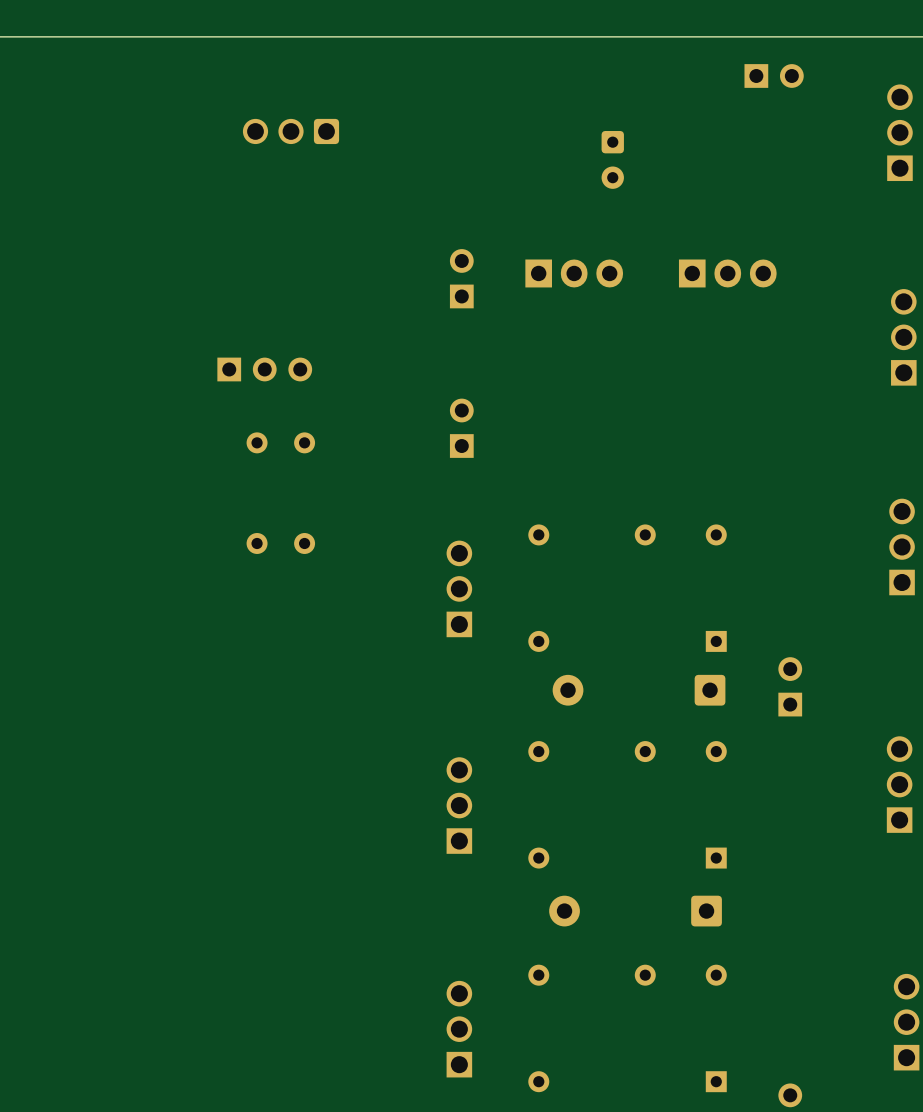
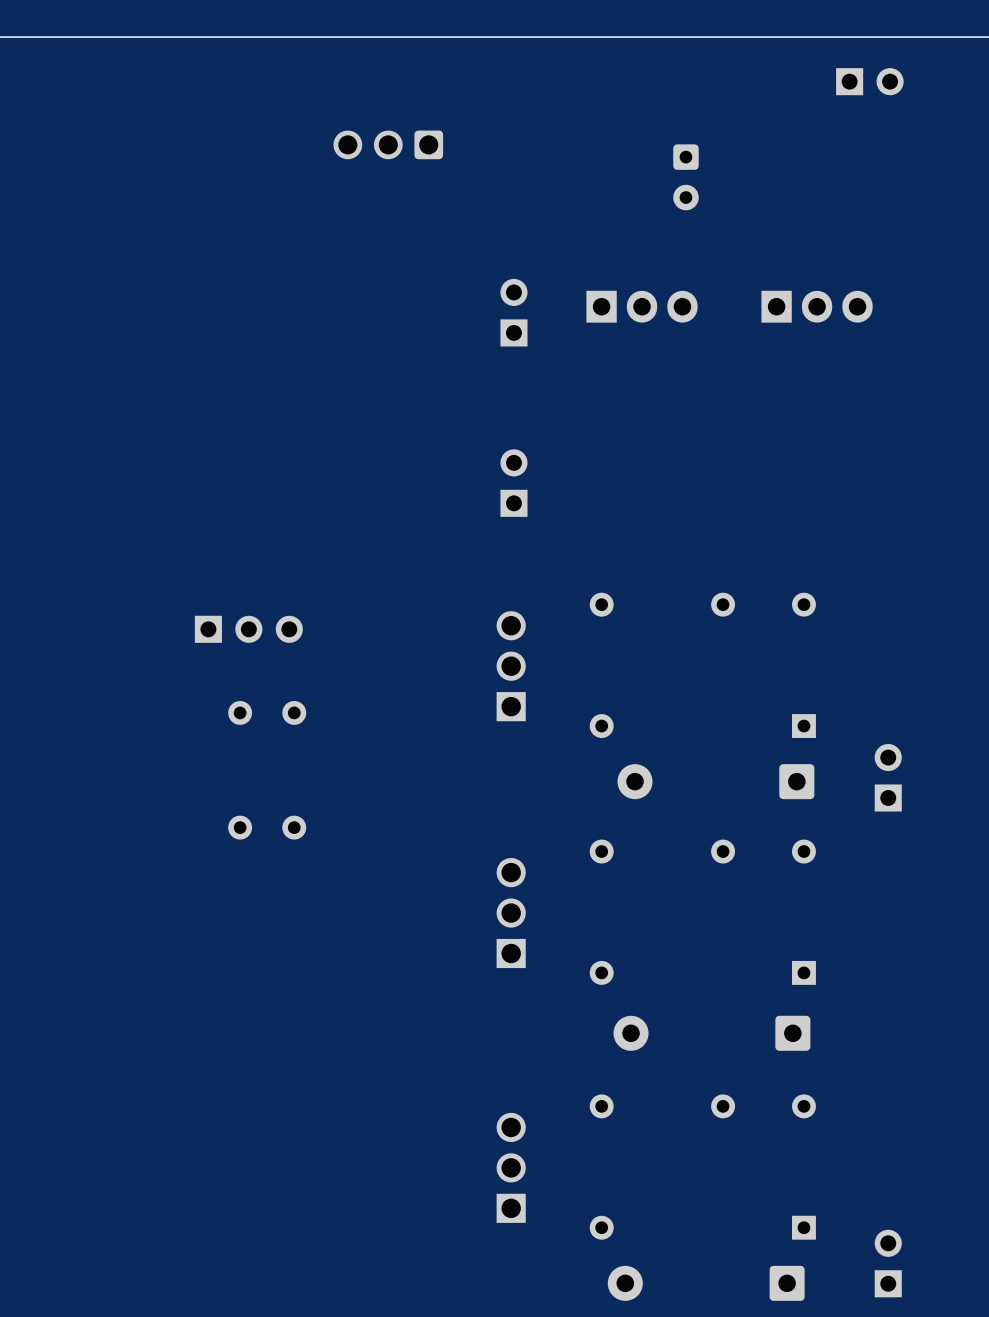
part position: (291, 131) -> (388, 144)
part position: (264, 369) -> (248, 629)
part: (280, 442) -> none
part position: (280, 543) -> (267, 712)
part: none -> (267, 827)

